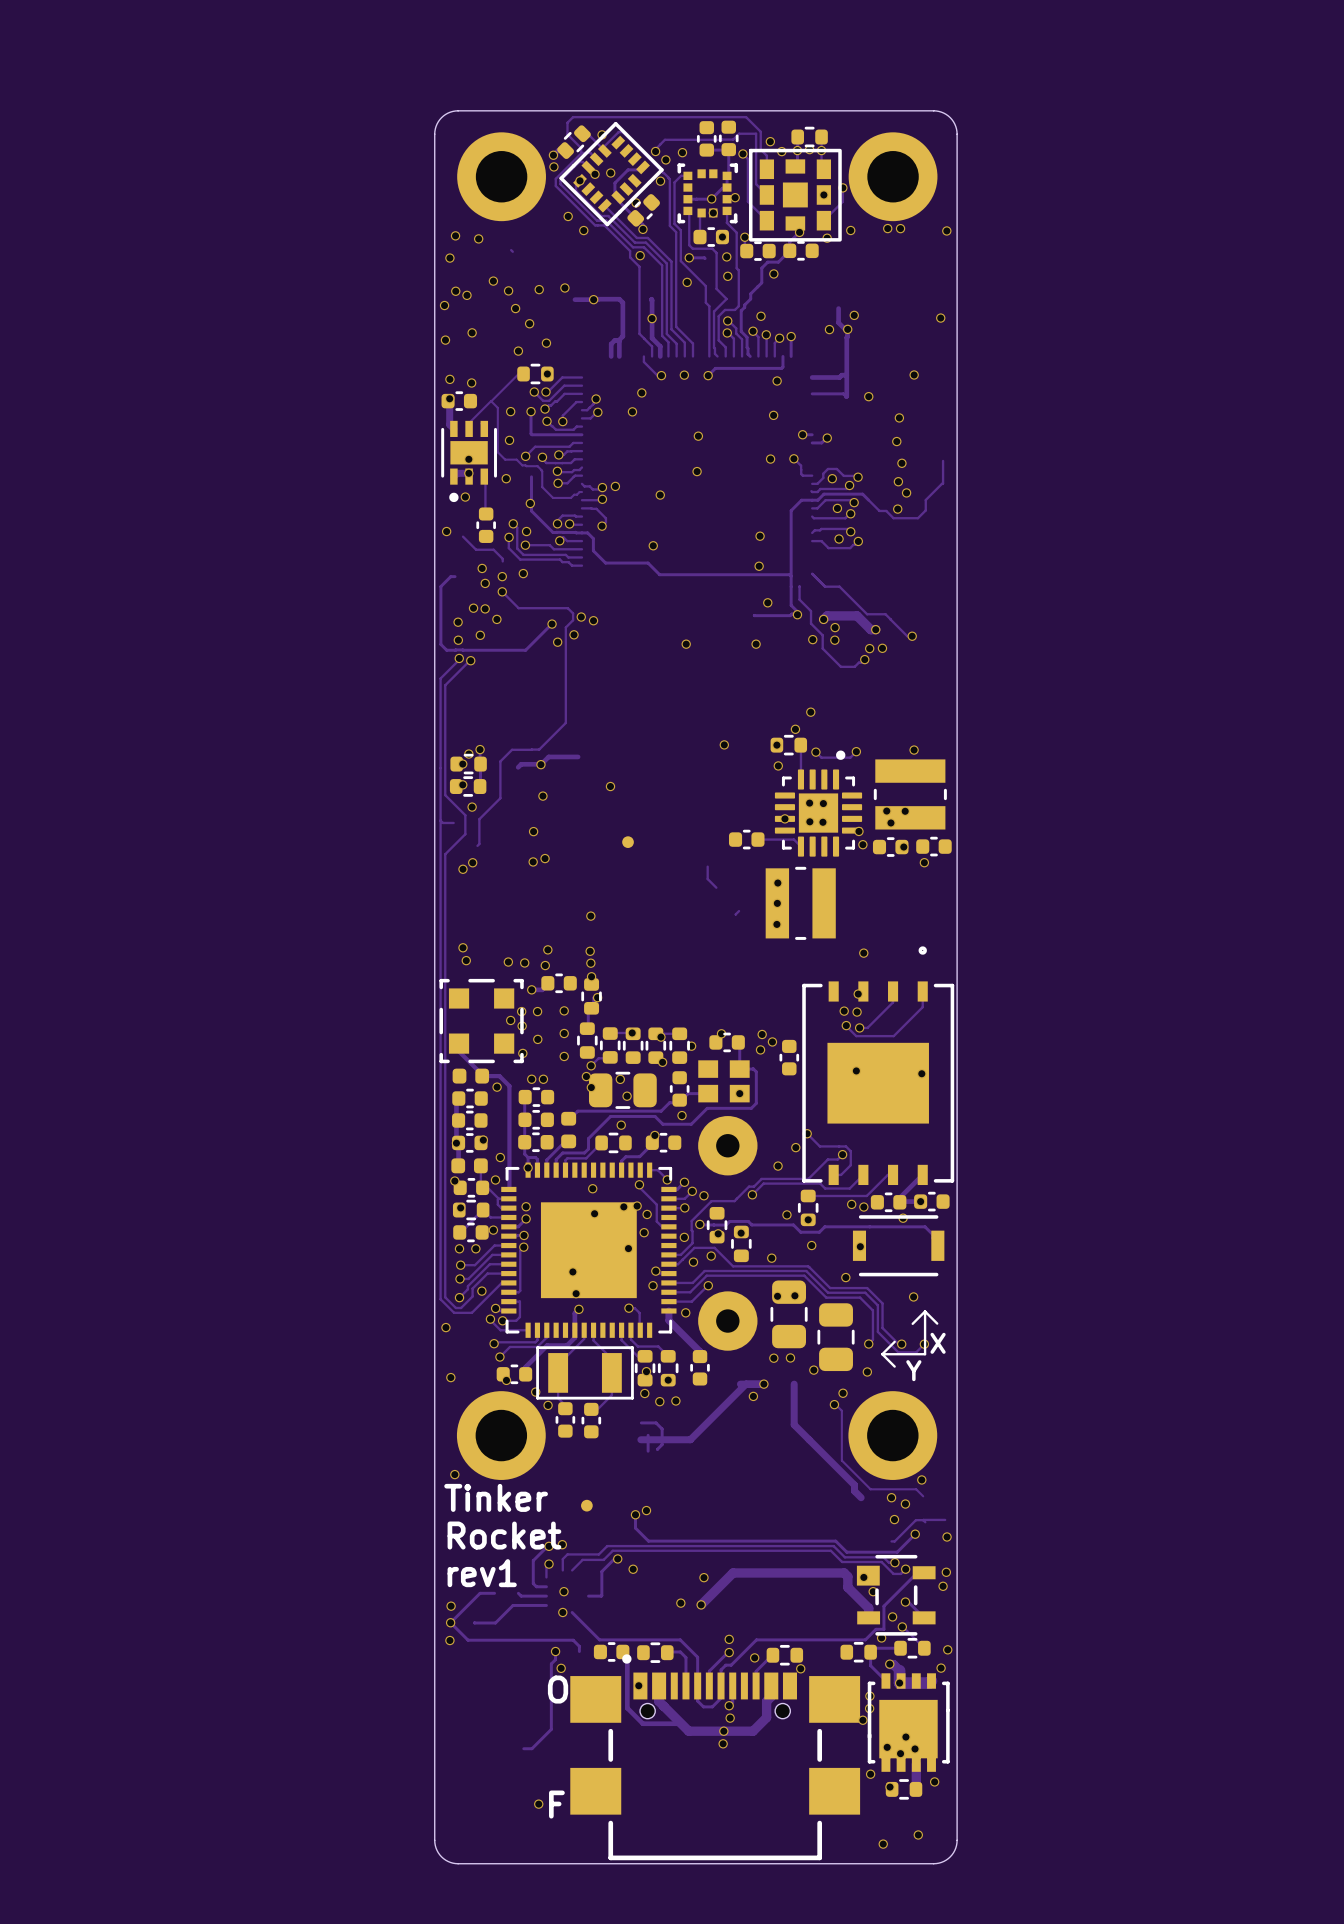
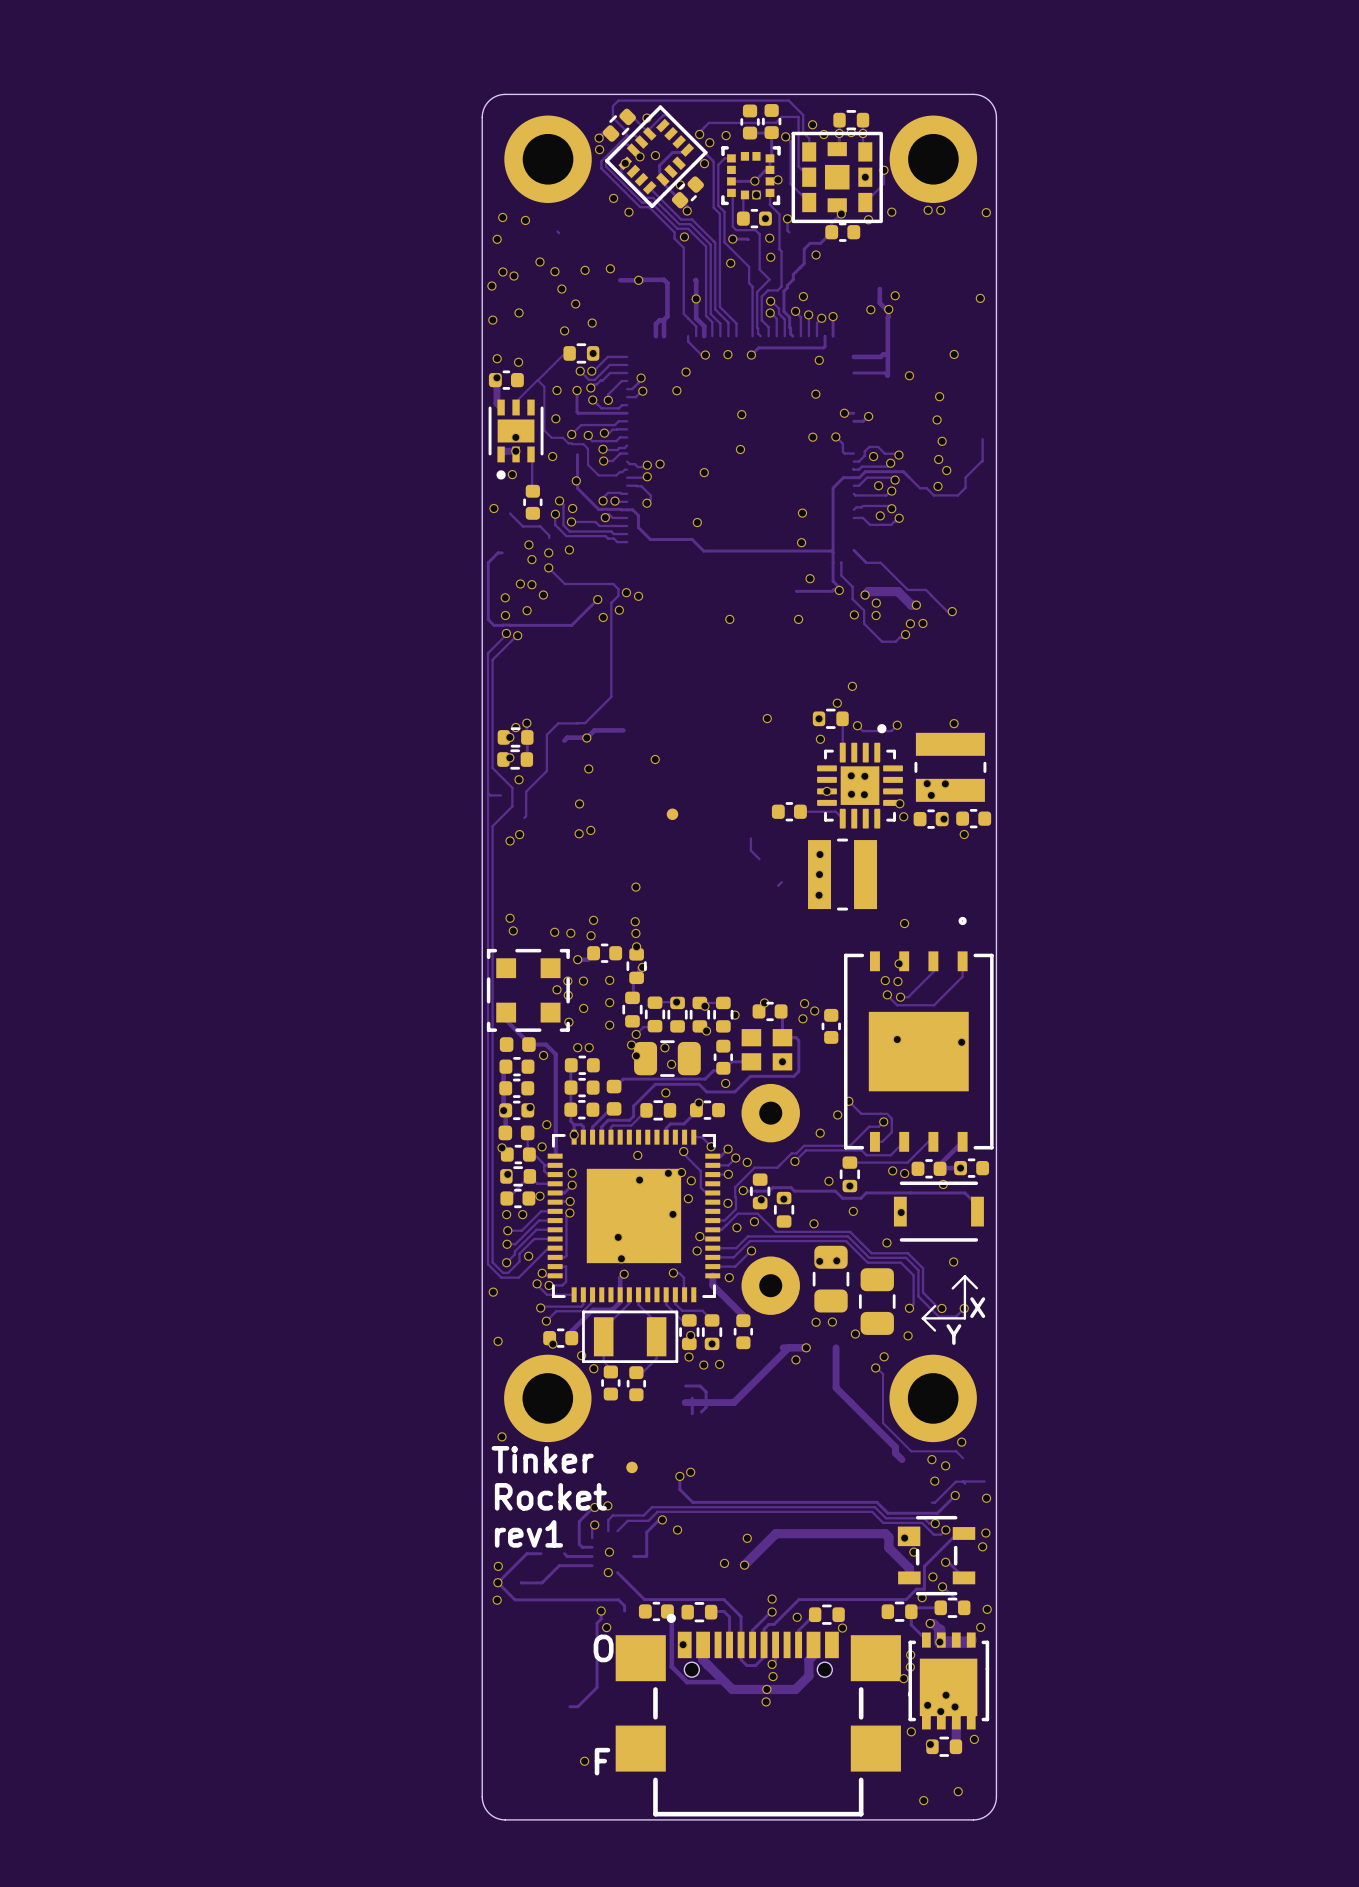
part: (757, 251) -> none

